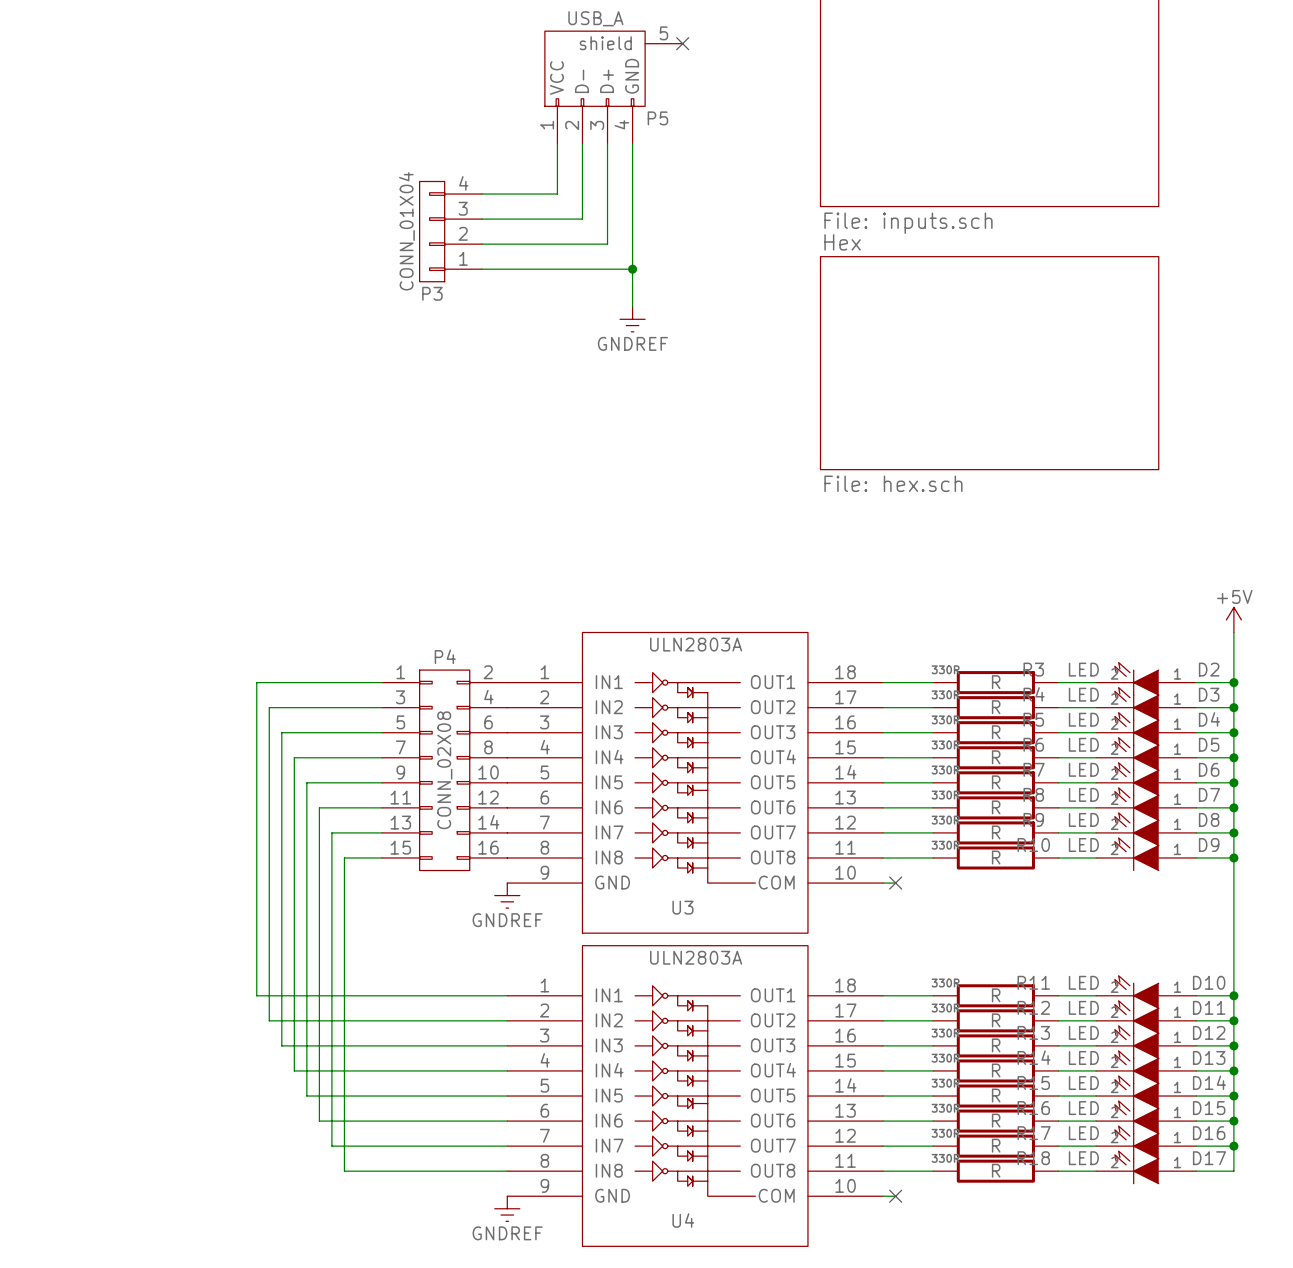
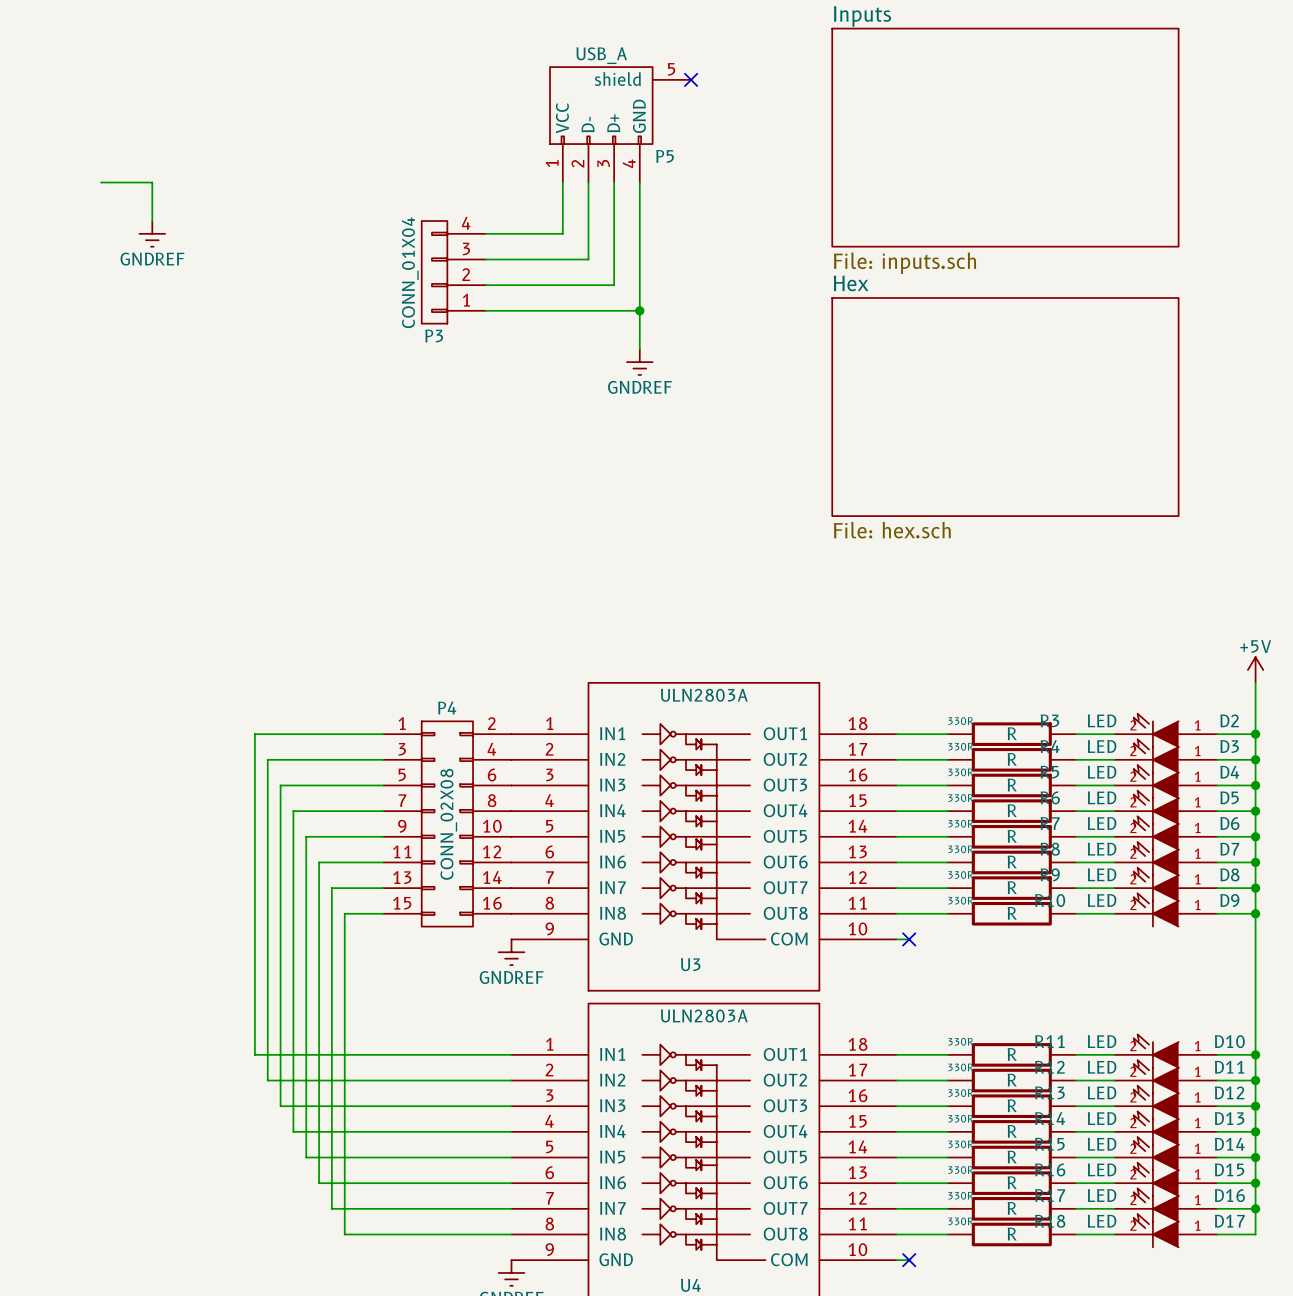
wire: none -> (100, 182) (152, 182) (152, 221)
power symbol: none -> GNDREF (152, 233)

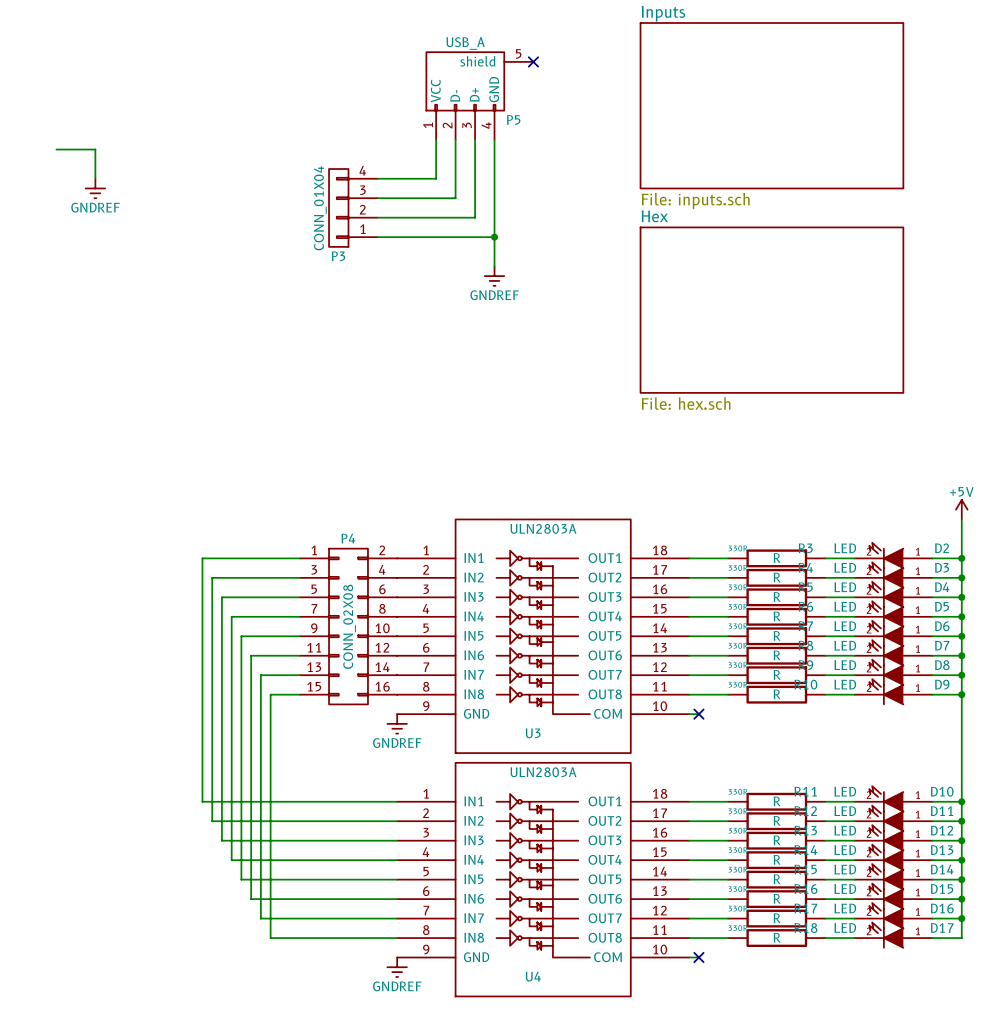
wire: (100, 182) (152, 182) (152, 221) -> (56, 149) (95, 149) (95, 178)
power symbol position: GNDREF (152, 233) -> GNDREF (95, 188)

